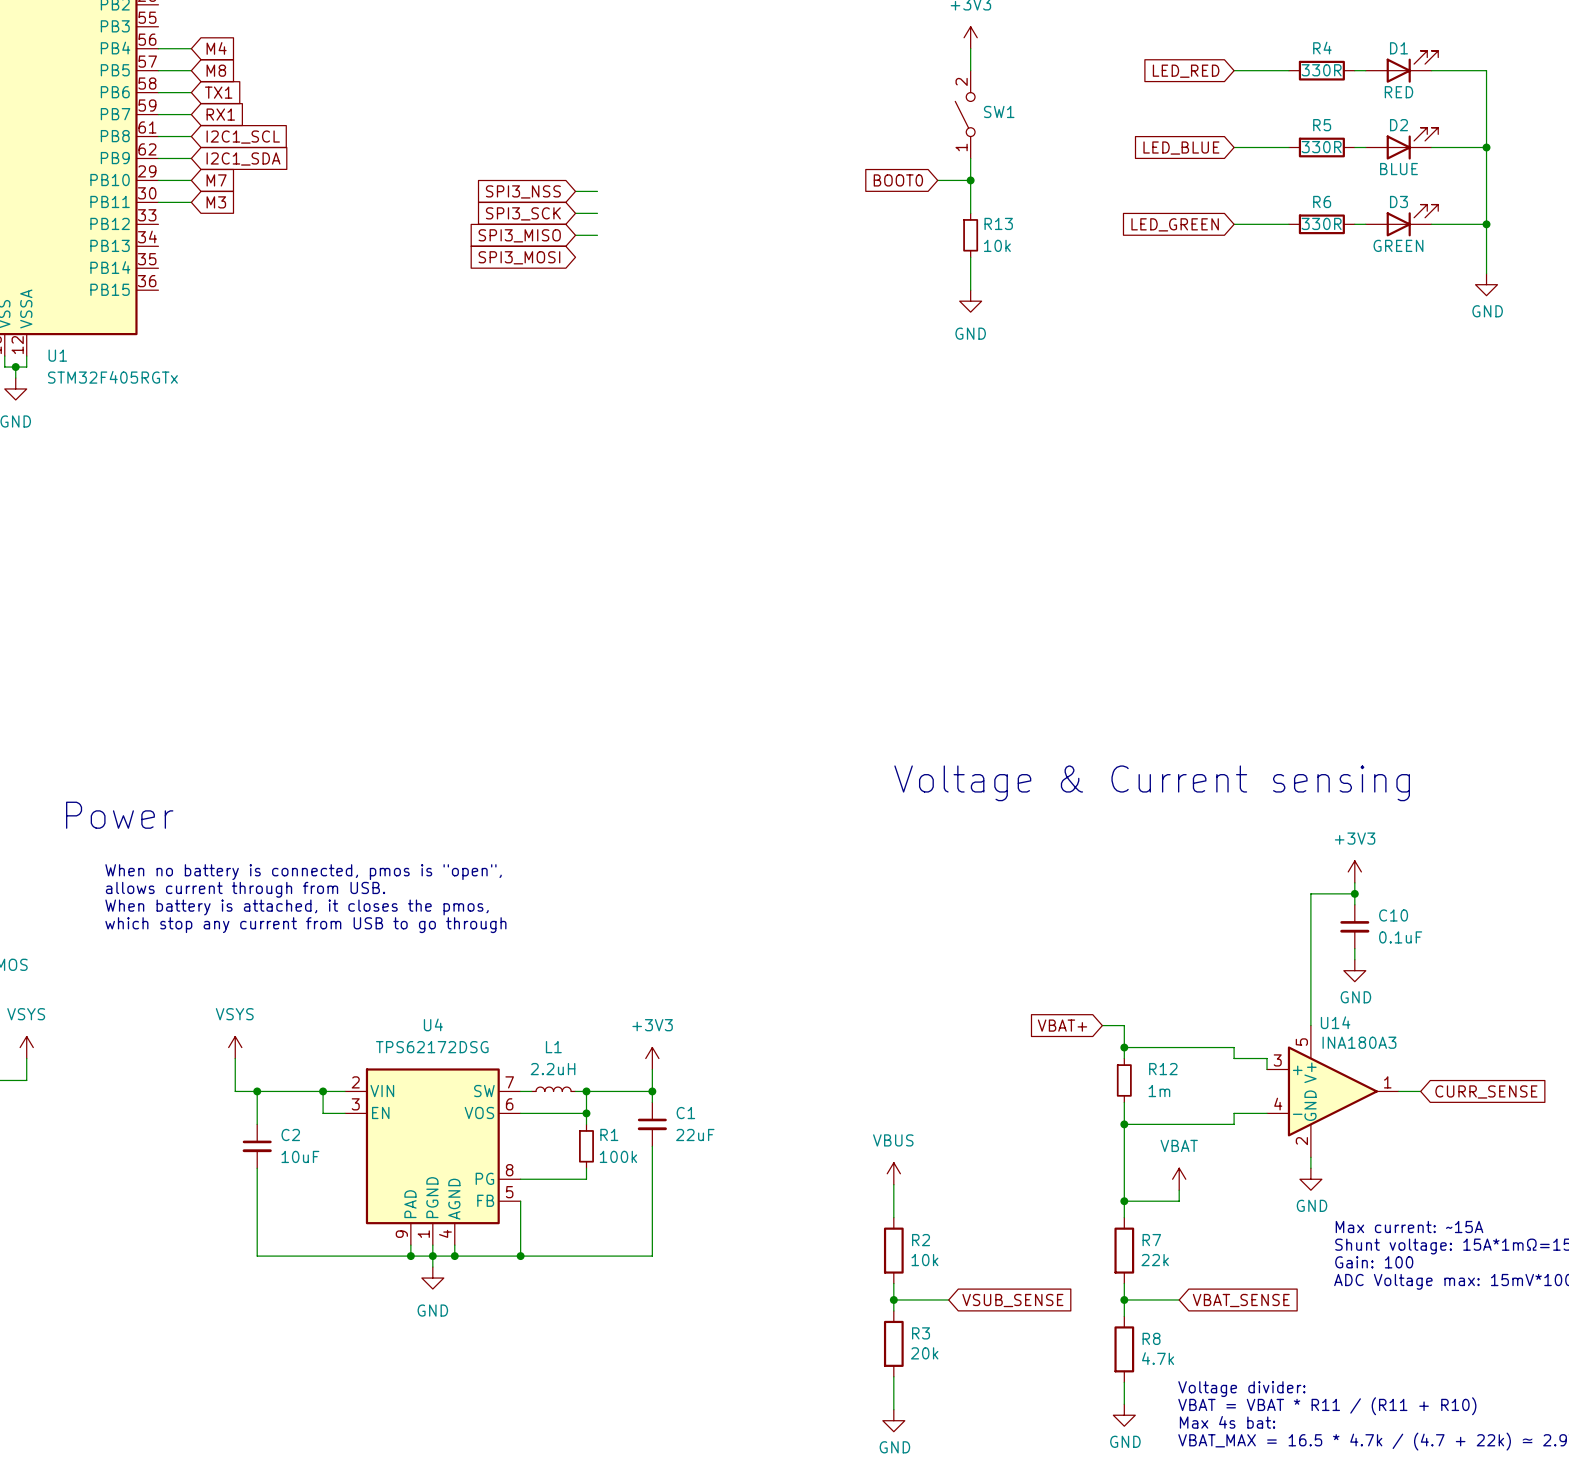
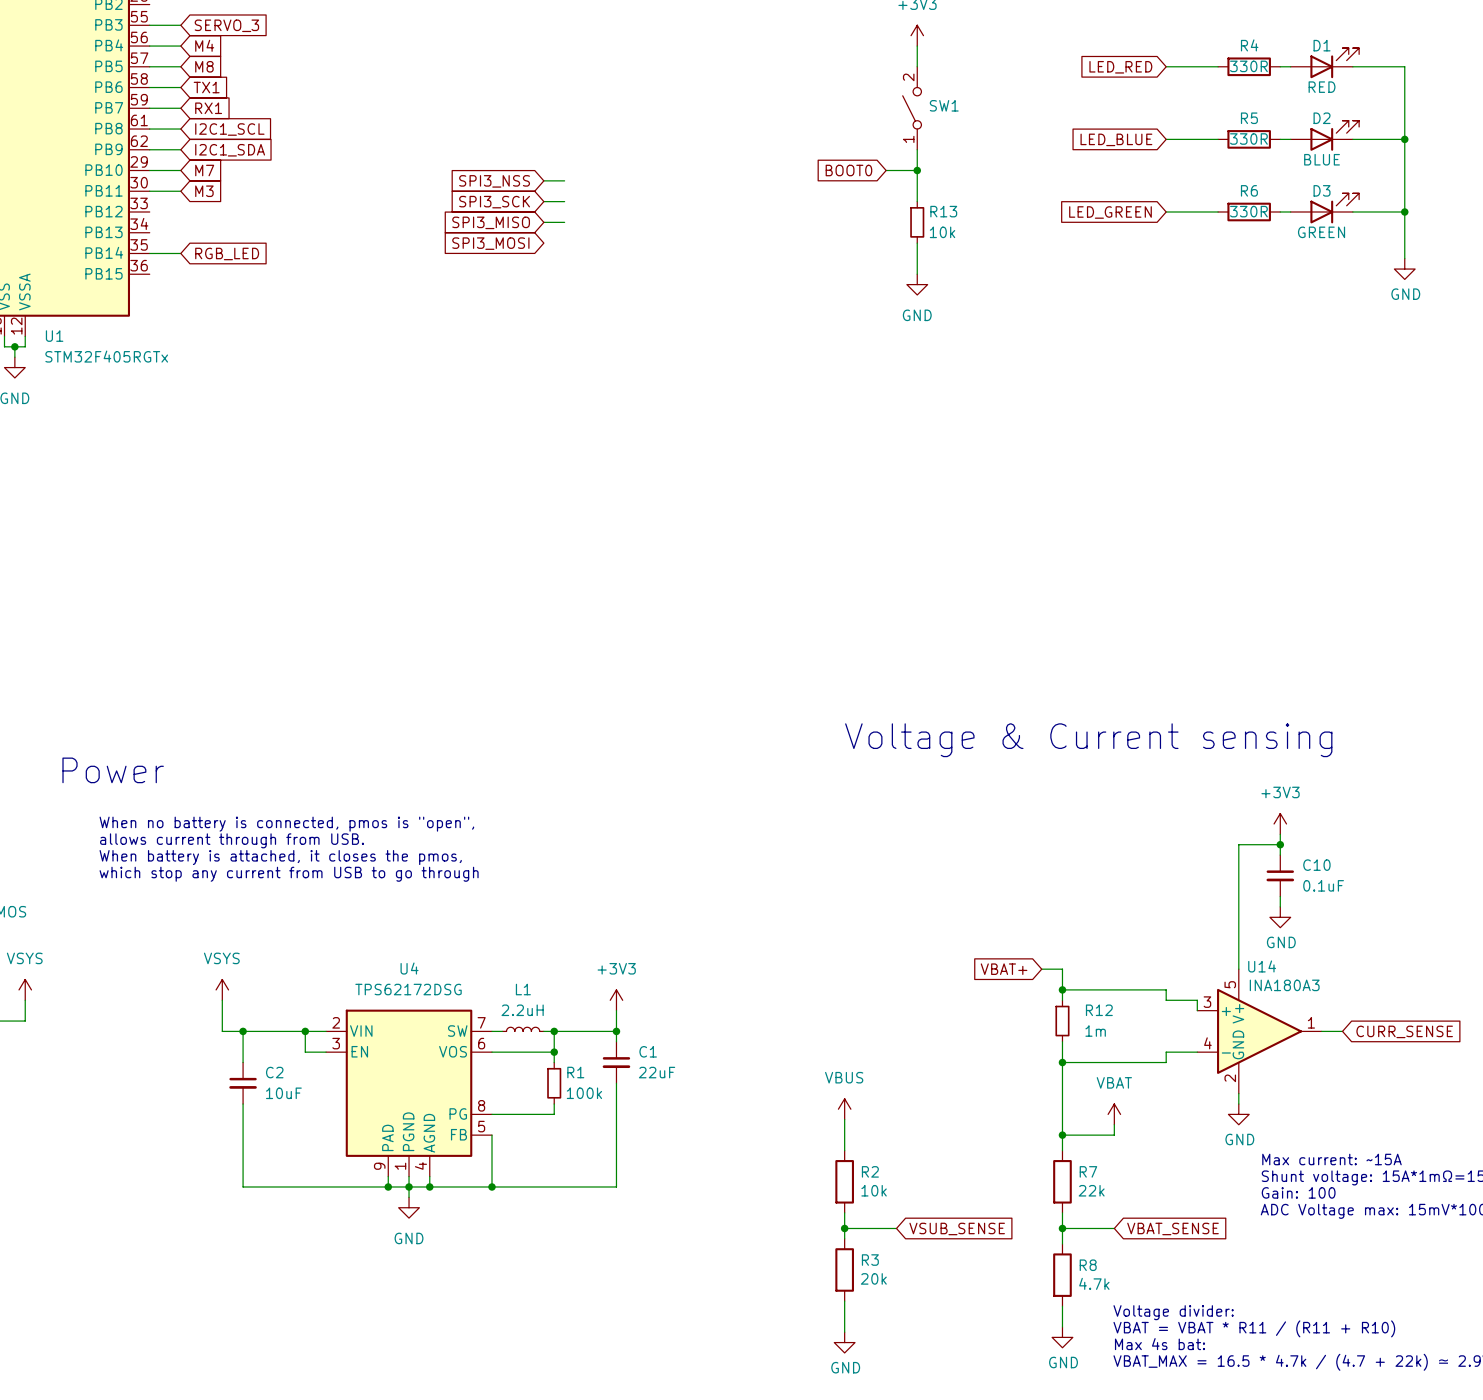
wire: none -> (149, 25) (180, 25)
global label: none -> SERVO_3 (226, 25)
wire: none -> (149, 253) (180, 253)
global label: none -> RGB_LED (227, 253)

